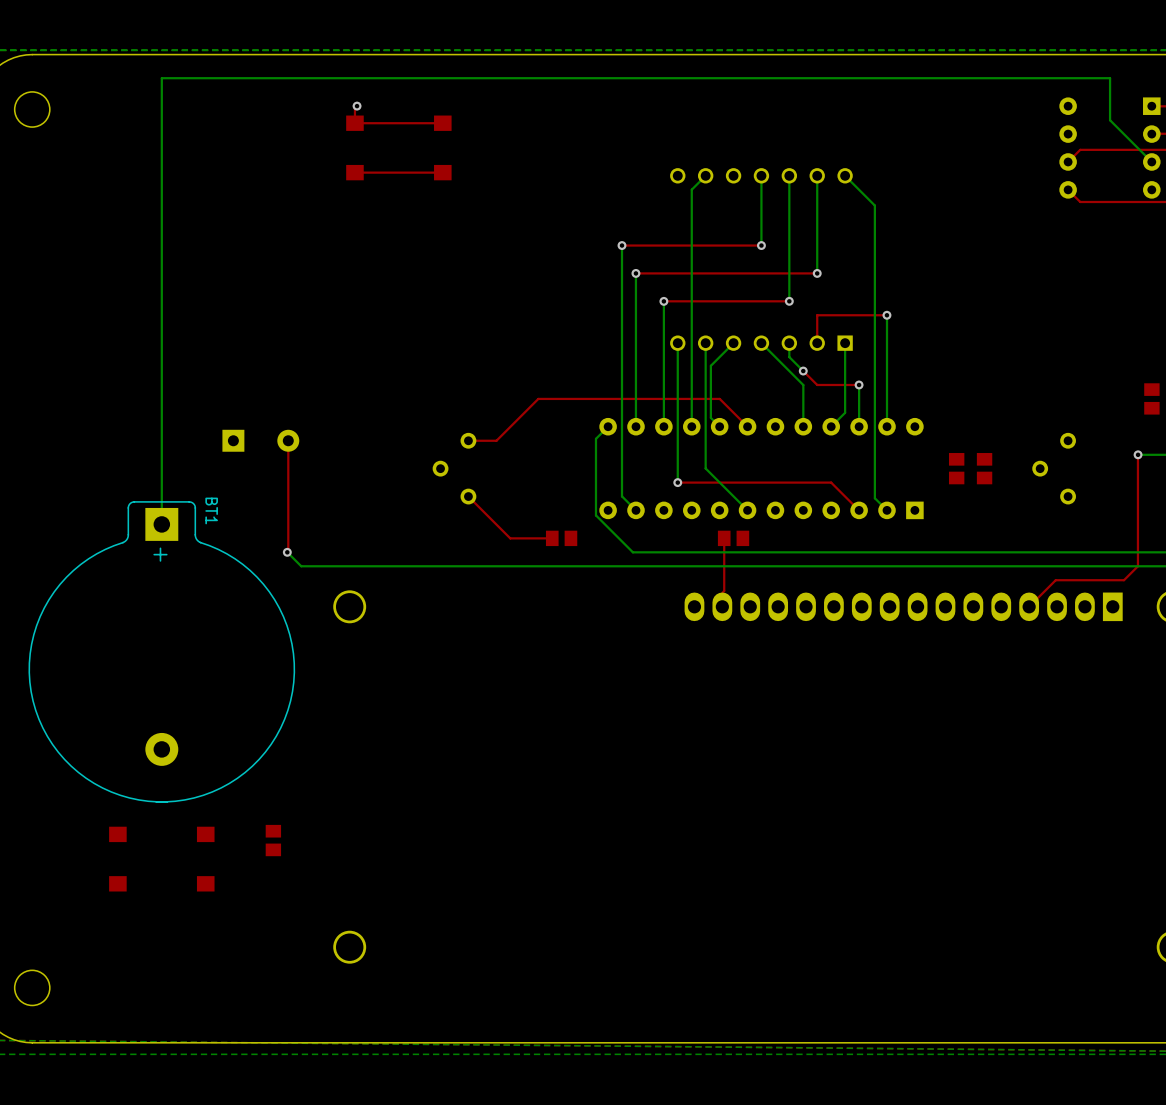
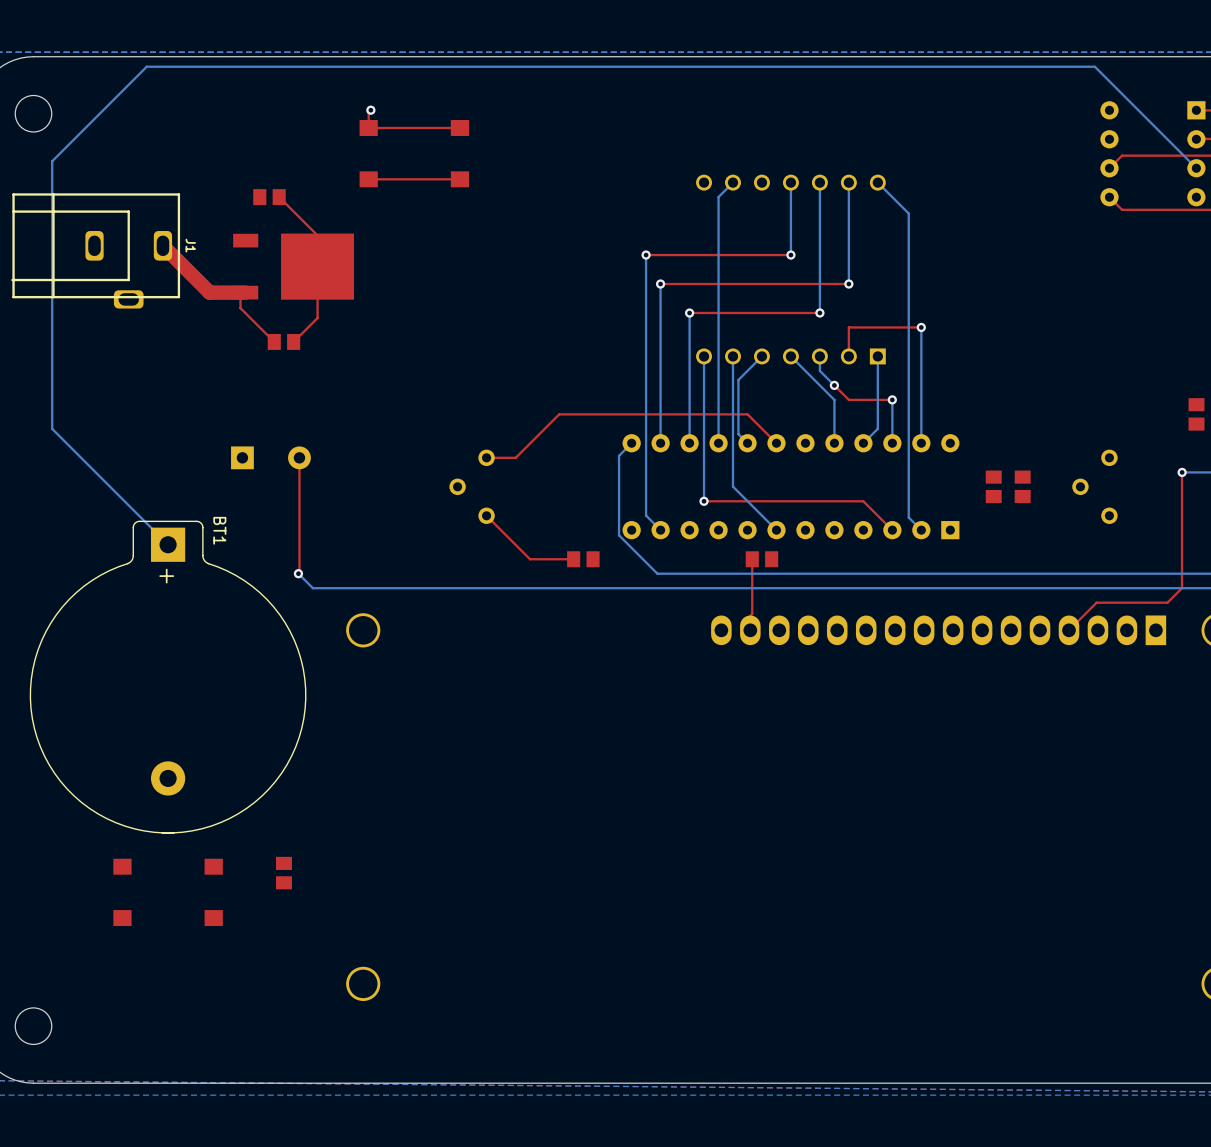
bottom track: (1110, 120) (1110, 78) (161, 78) (161, 524) -> (1153, 124) (1094, 66) (146, 66) (52, 161) (52, 428) (168, 544)
part: none -> (269, 197)
top track: none -> (279, 197) (317, 235) (317, 318) (293, 341)
top track: none -> (162, 245) (209, 292) (245, 292) (240, 297) (240, 308) (274, 341)
J1: none -> (95, 250)
part: none -> (293, 266)
part: none -> (283, 341)

